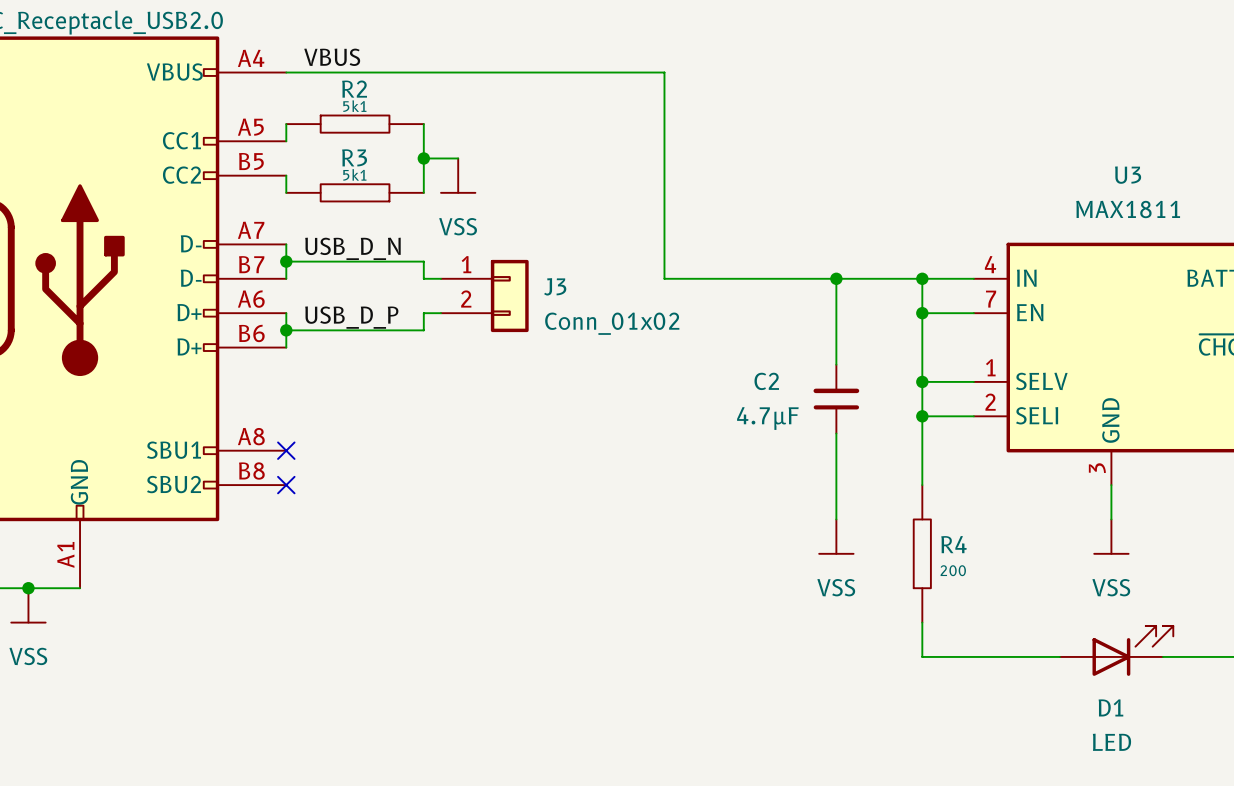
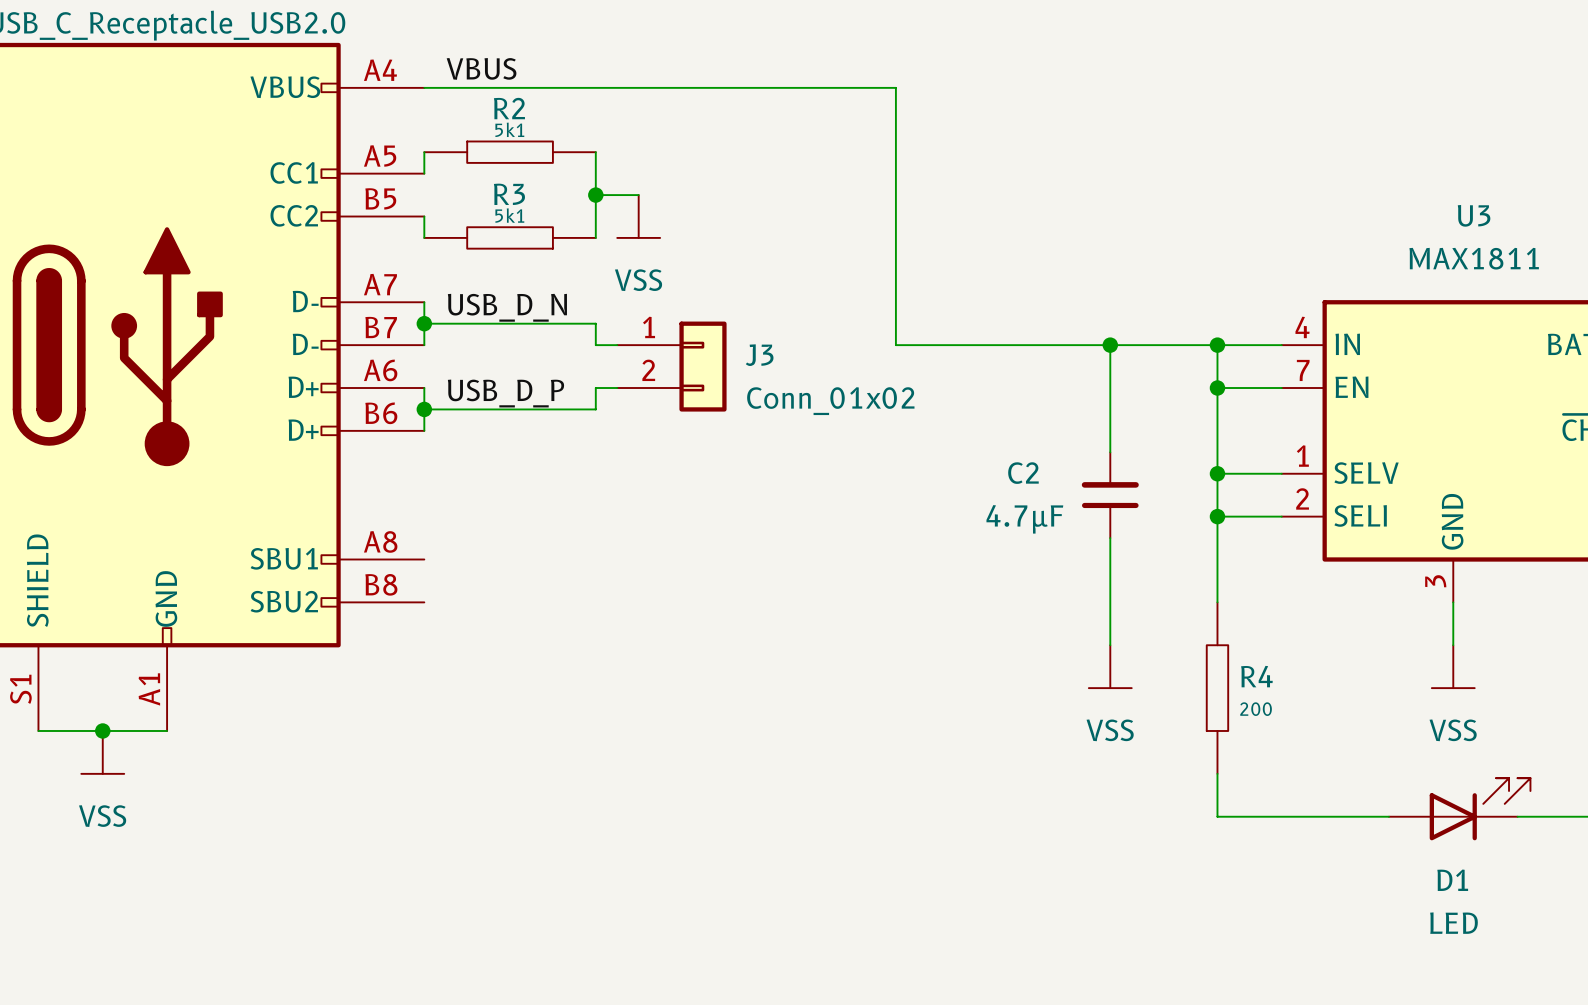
no-connect mark: (286, 450) -> none
no-connect mark: (286, 485) -> none

